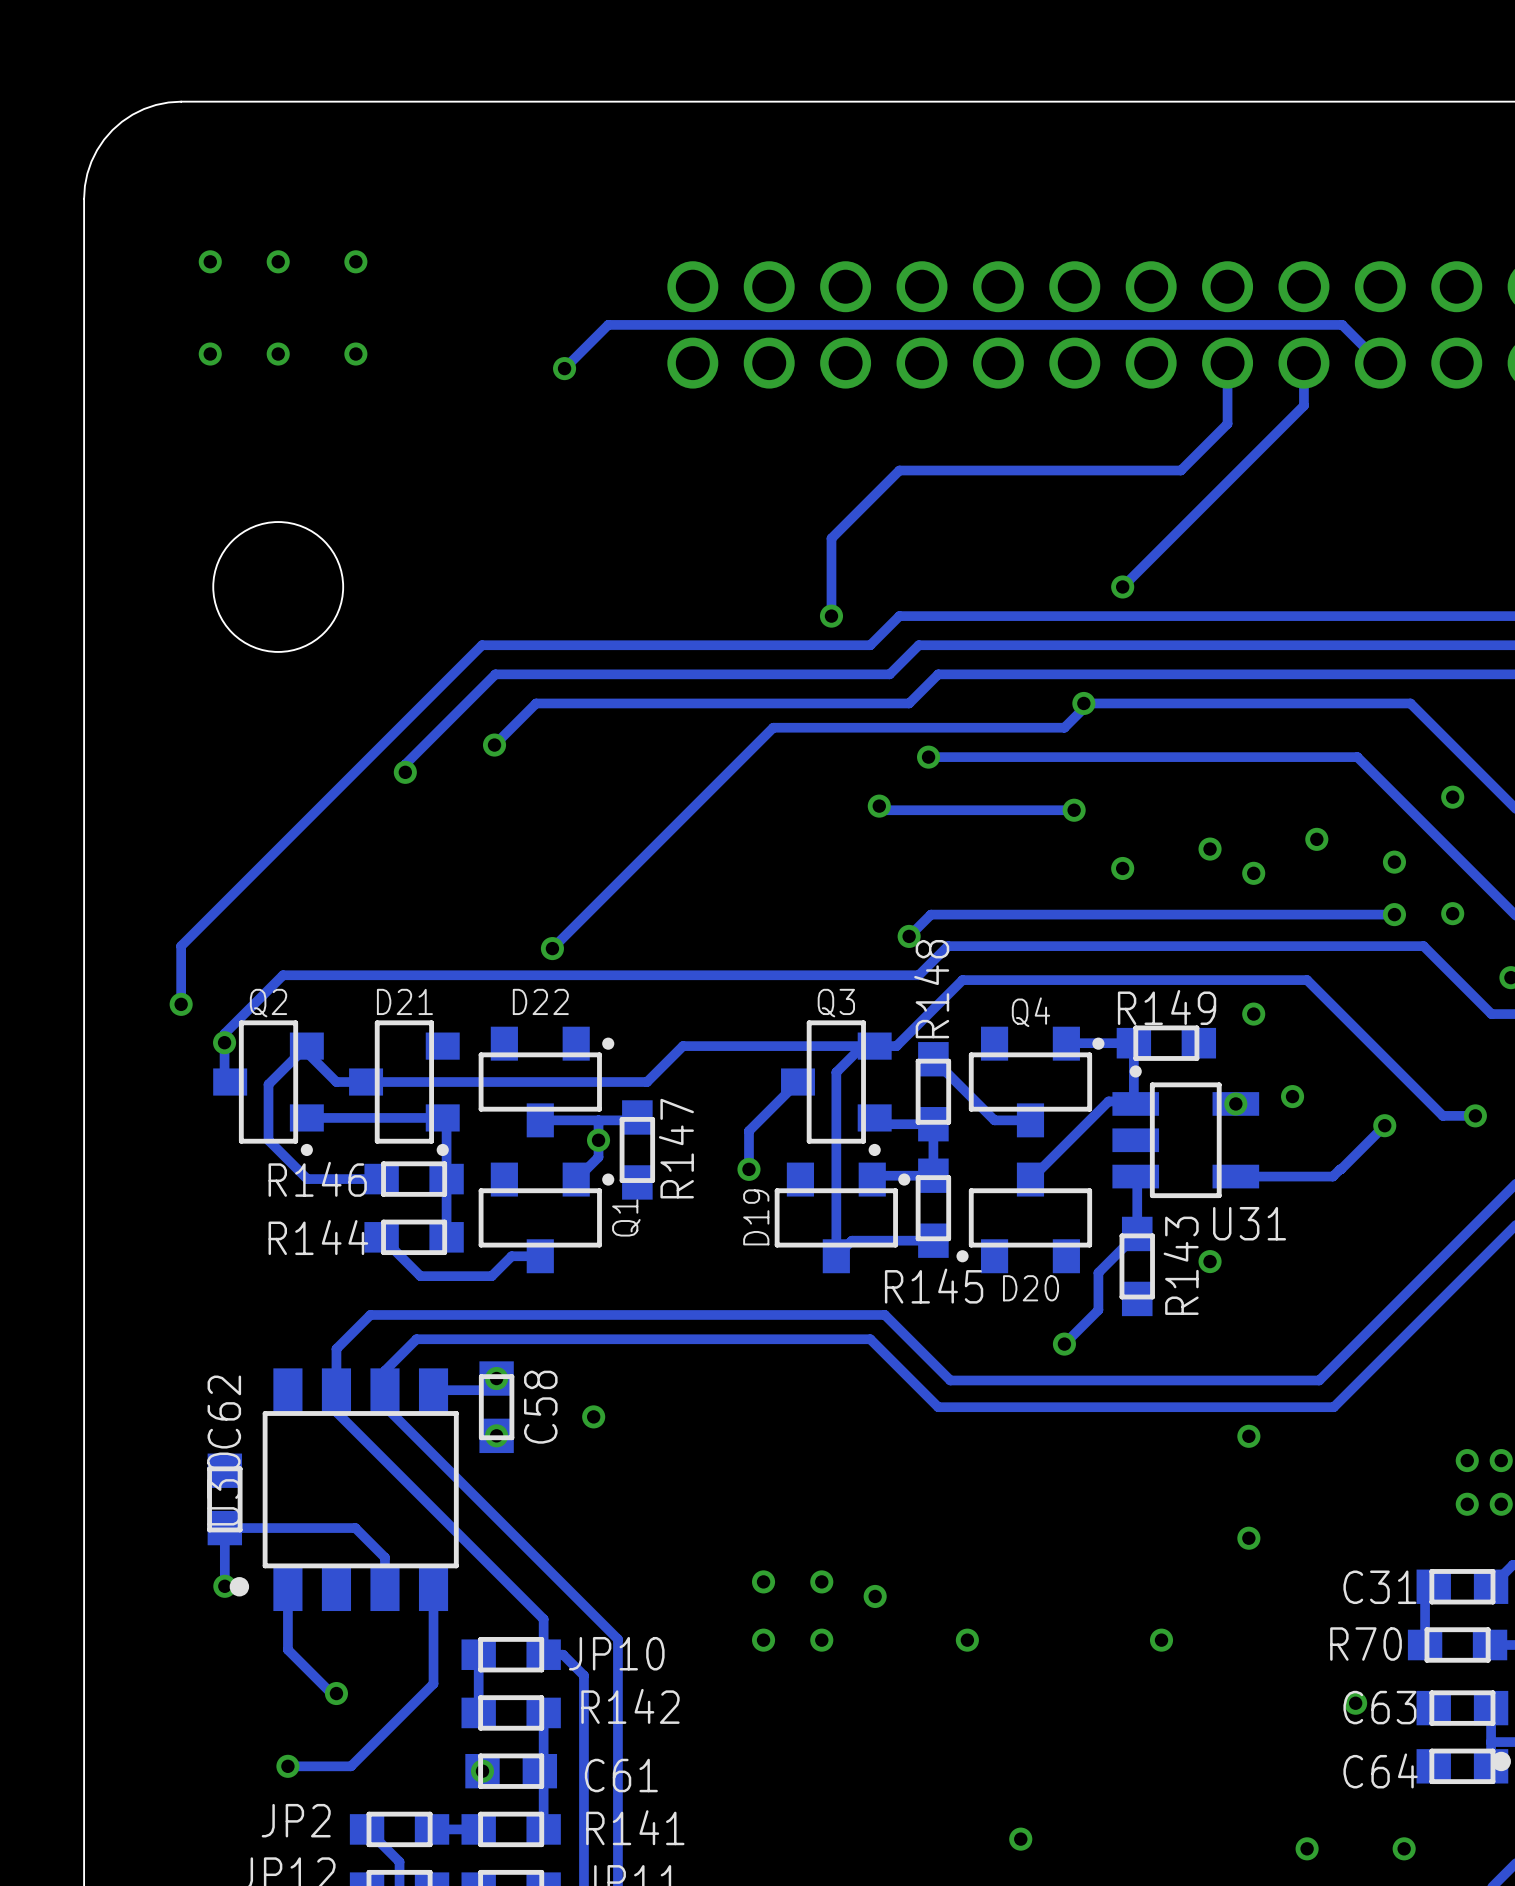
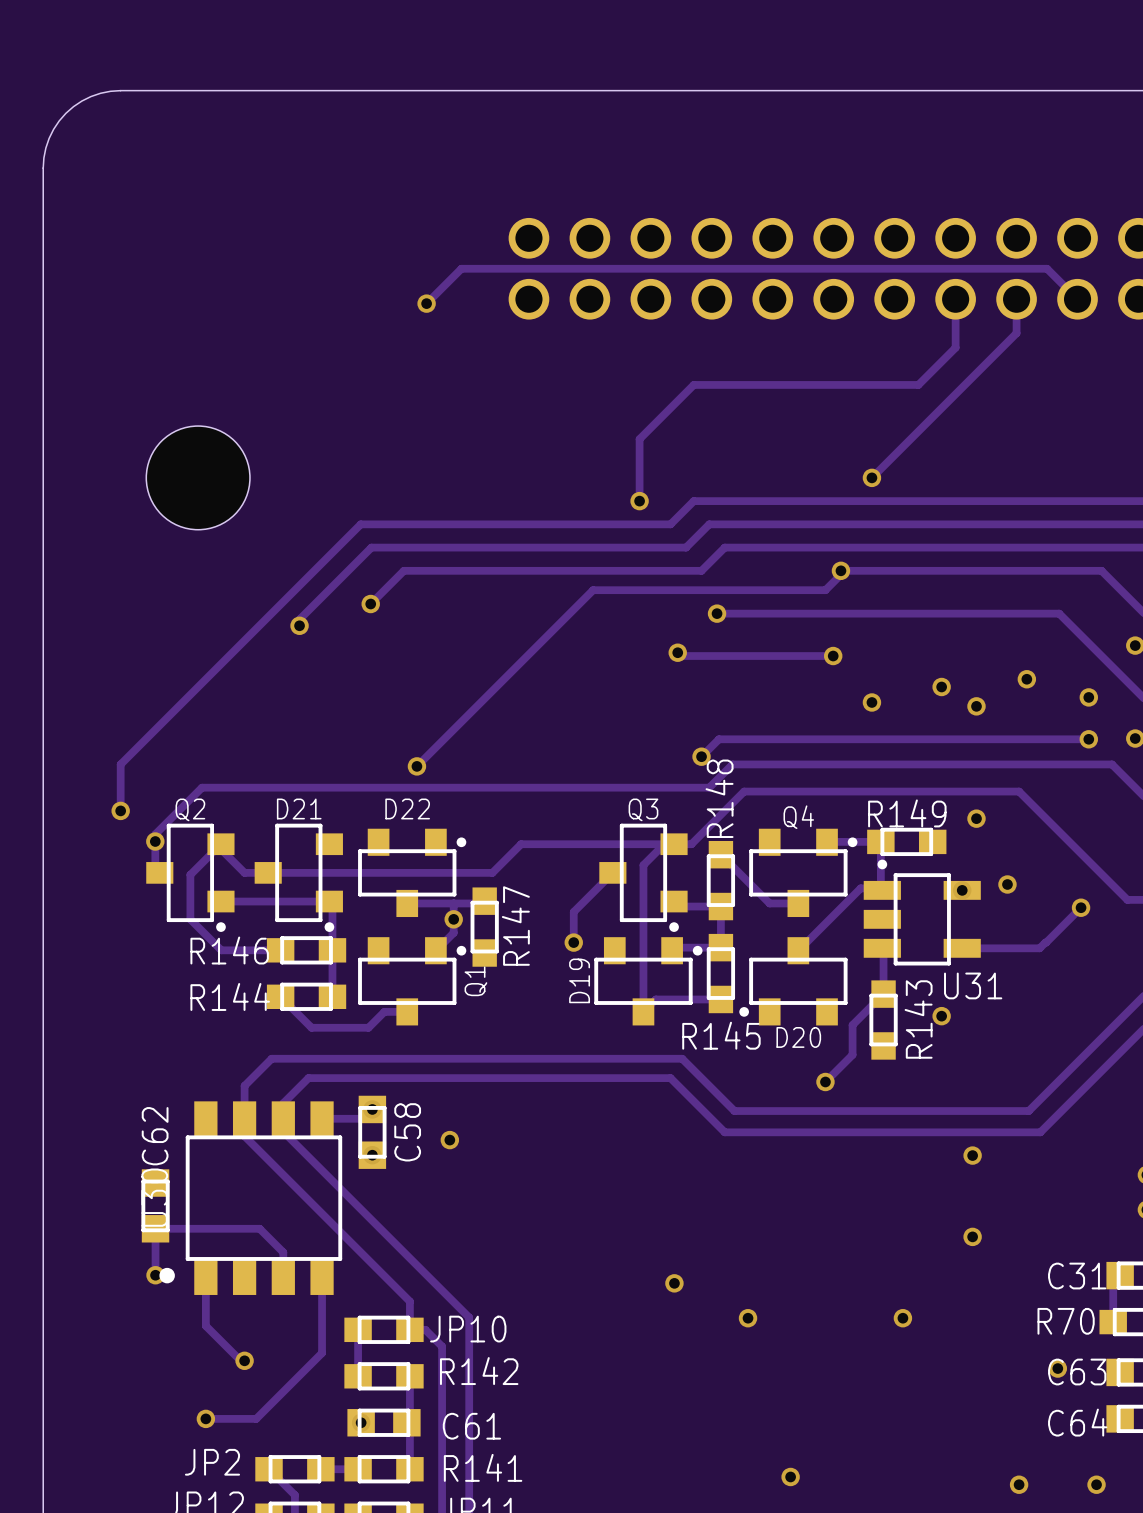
via: (210, 261) -> none
via: (278, 261) -> none
via: (355, 261) -> none
via: (210, 354) -> none
via: (278, 354) -> none
via: (355, 354) -> none
via: (763, 1581) -> none
via: (821, 1581) -> none
via: (763, 1640) -> none
via: (821, 1640) -> none

